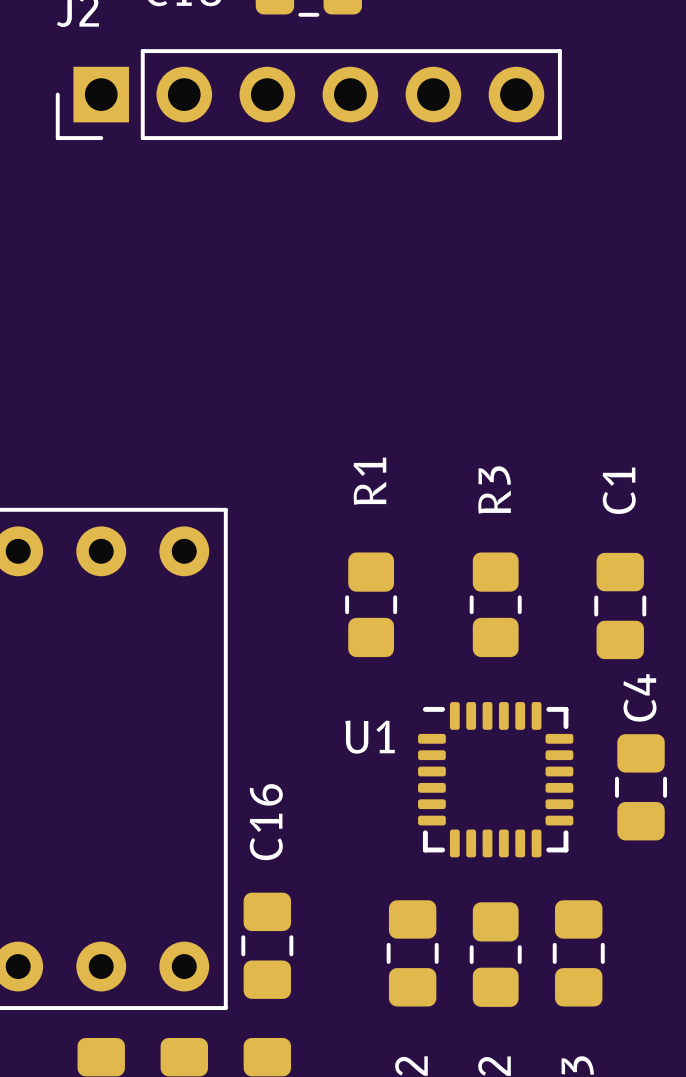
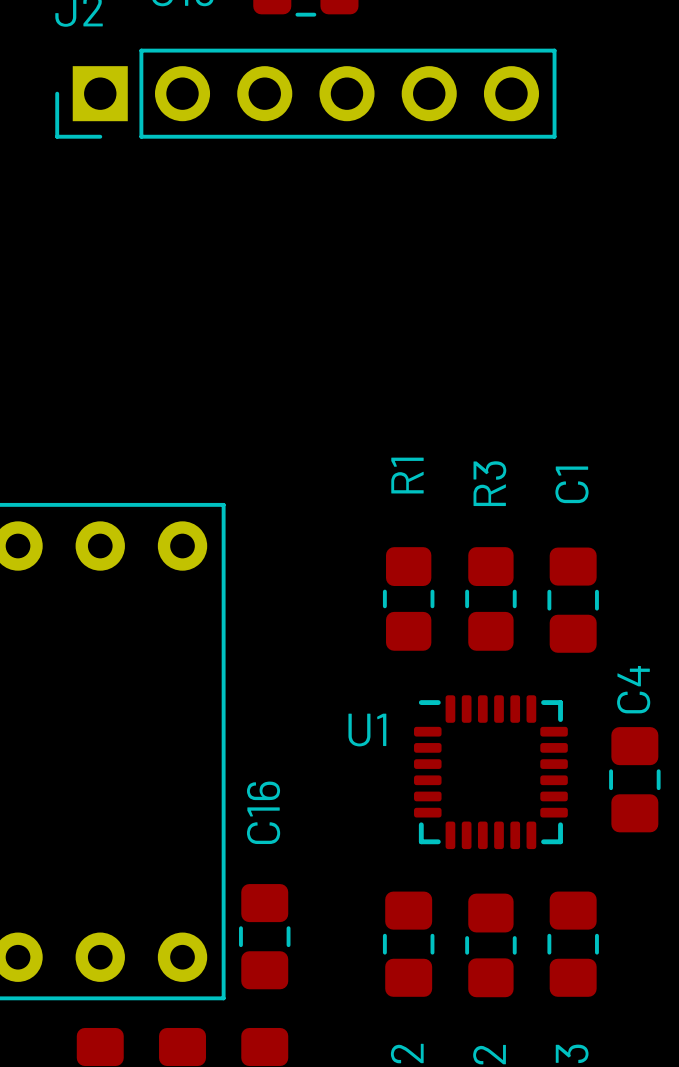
R1 position: (371, 604) -> (408, 598)
C1 position: (620, 606) -> (573, 600)

